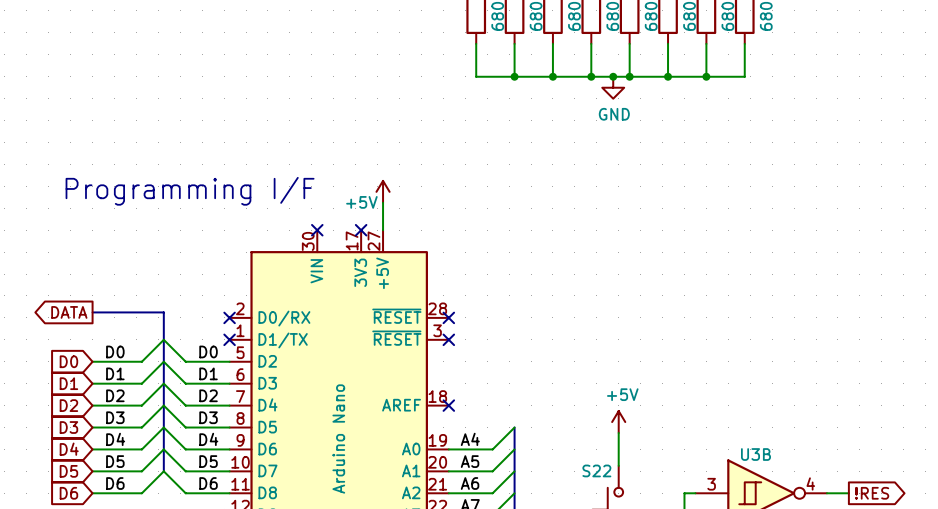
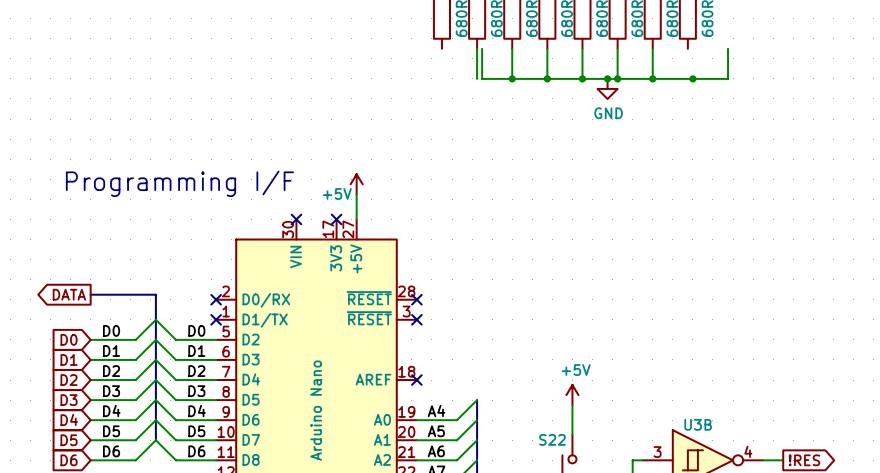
wire: (476, 43) (476, 76) (520, 76) -> (482, 48) (482, 78)
wire: (744, 43) (744, 76) -> (728, 48) (728, 78) (687, 78)
junction: (514, 76) -> none
junction position: (613, 76) -> (607, 78)
junction: none -> (692, 78)
power symbol position: GND (613, 87) -> GND (607, 88)

